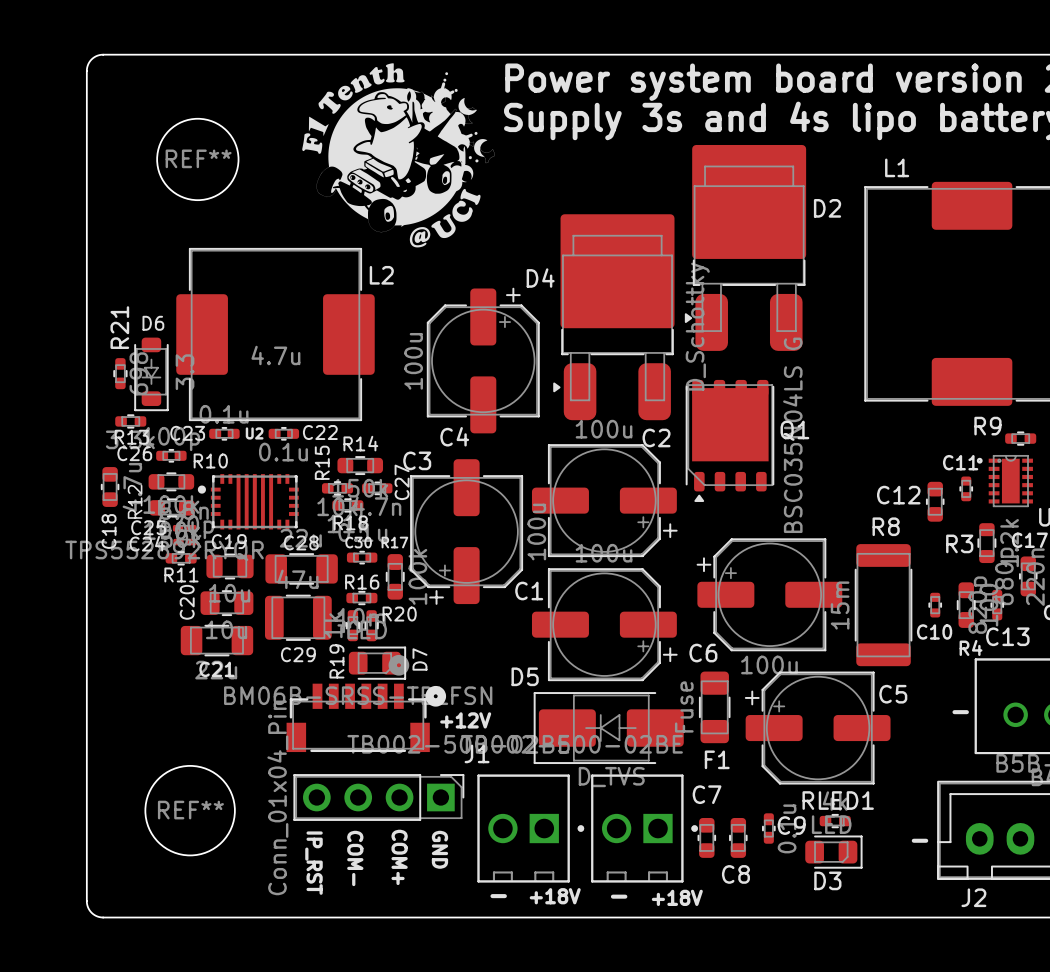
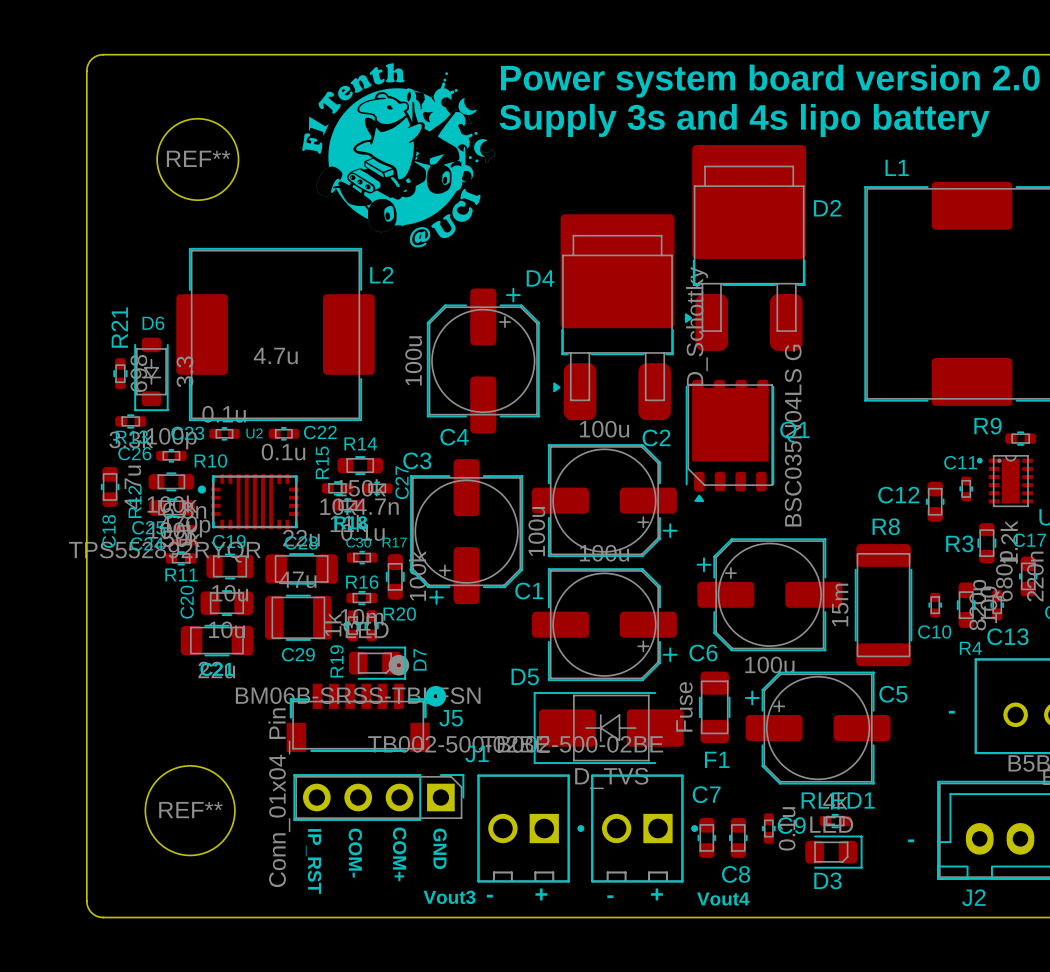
+12V name: +12V (465, 720) -> J5 (451, 718)
text: none -> + (541, 894)
+18V name: +18V (555, 896) -> Vout3 (449, 897)
text: none -> + (656, 894)
+18V name: +18V (677, 897) -> Vout4 (723, 899)

